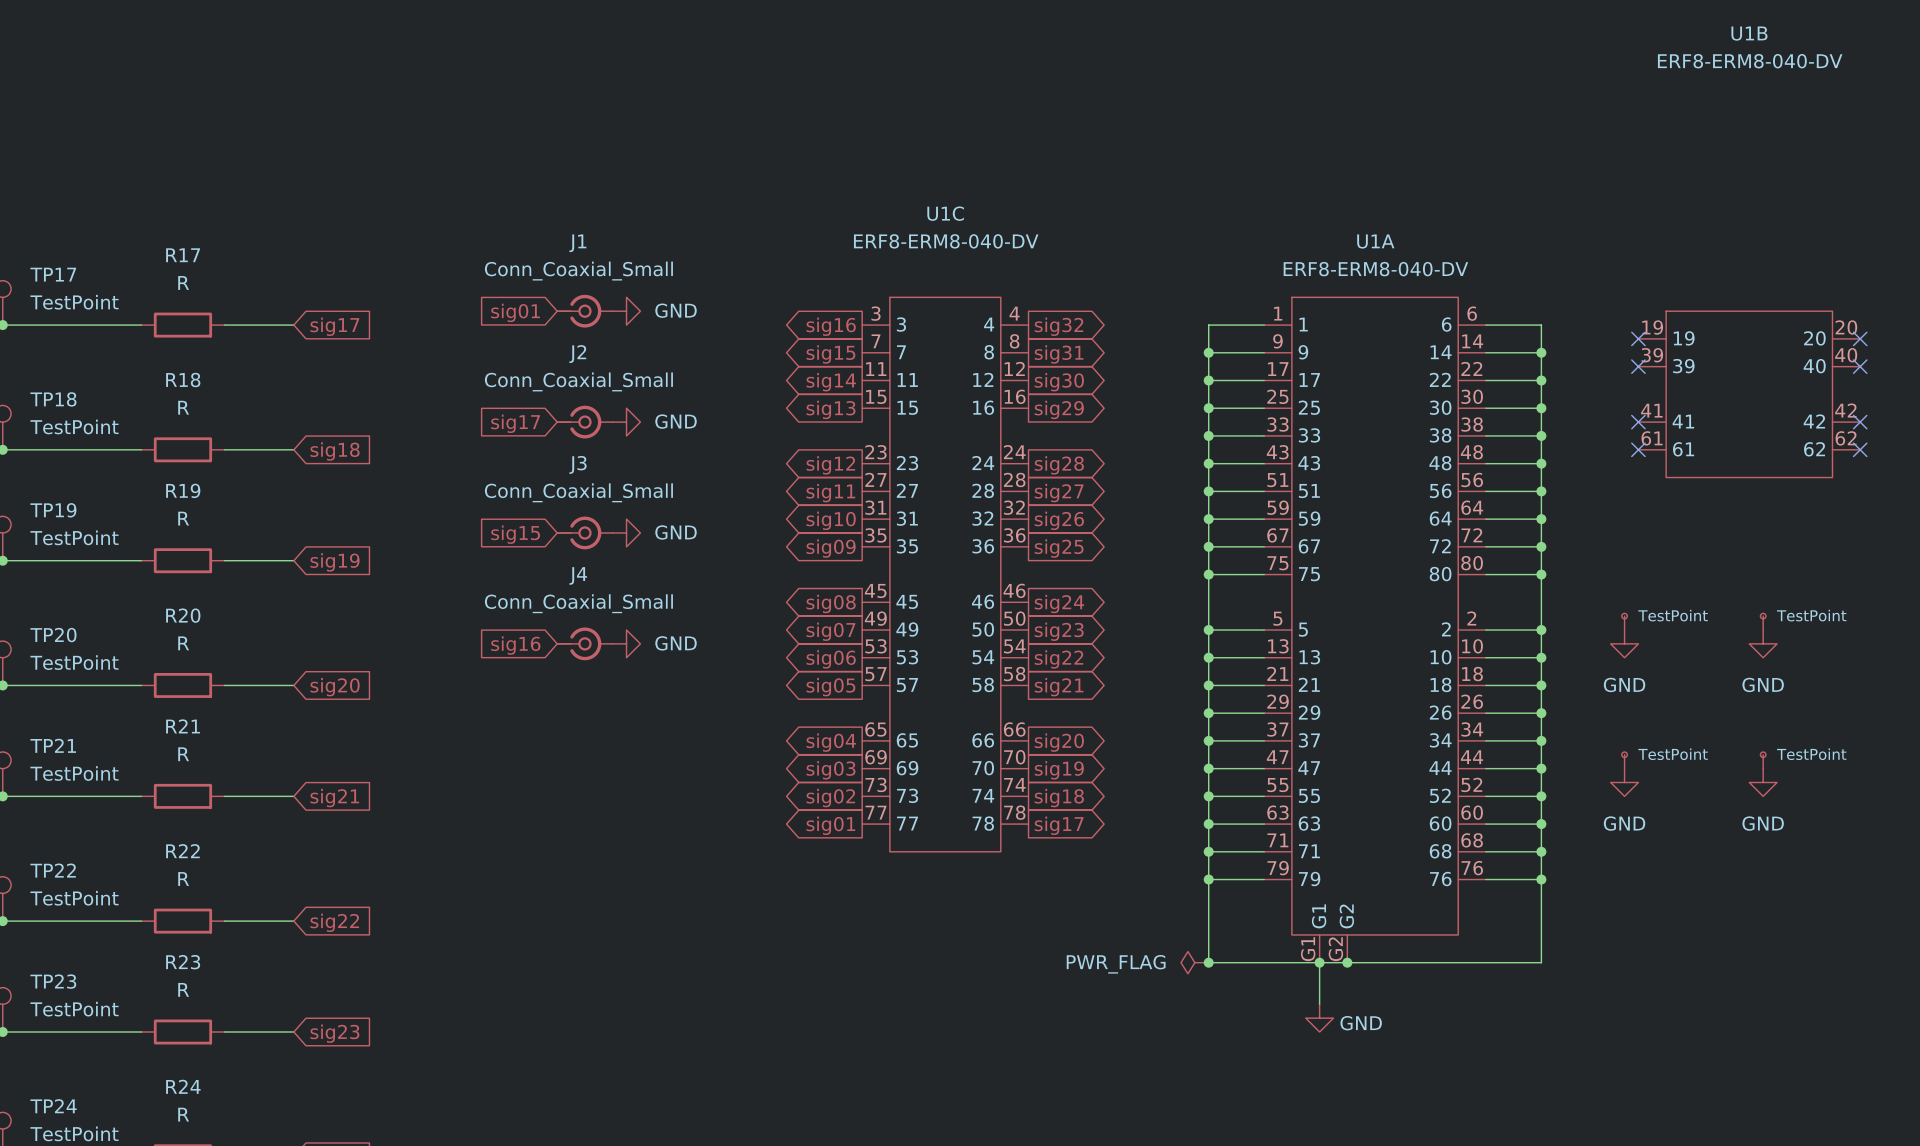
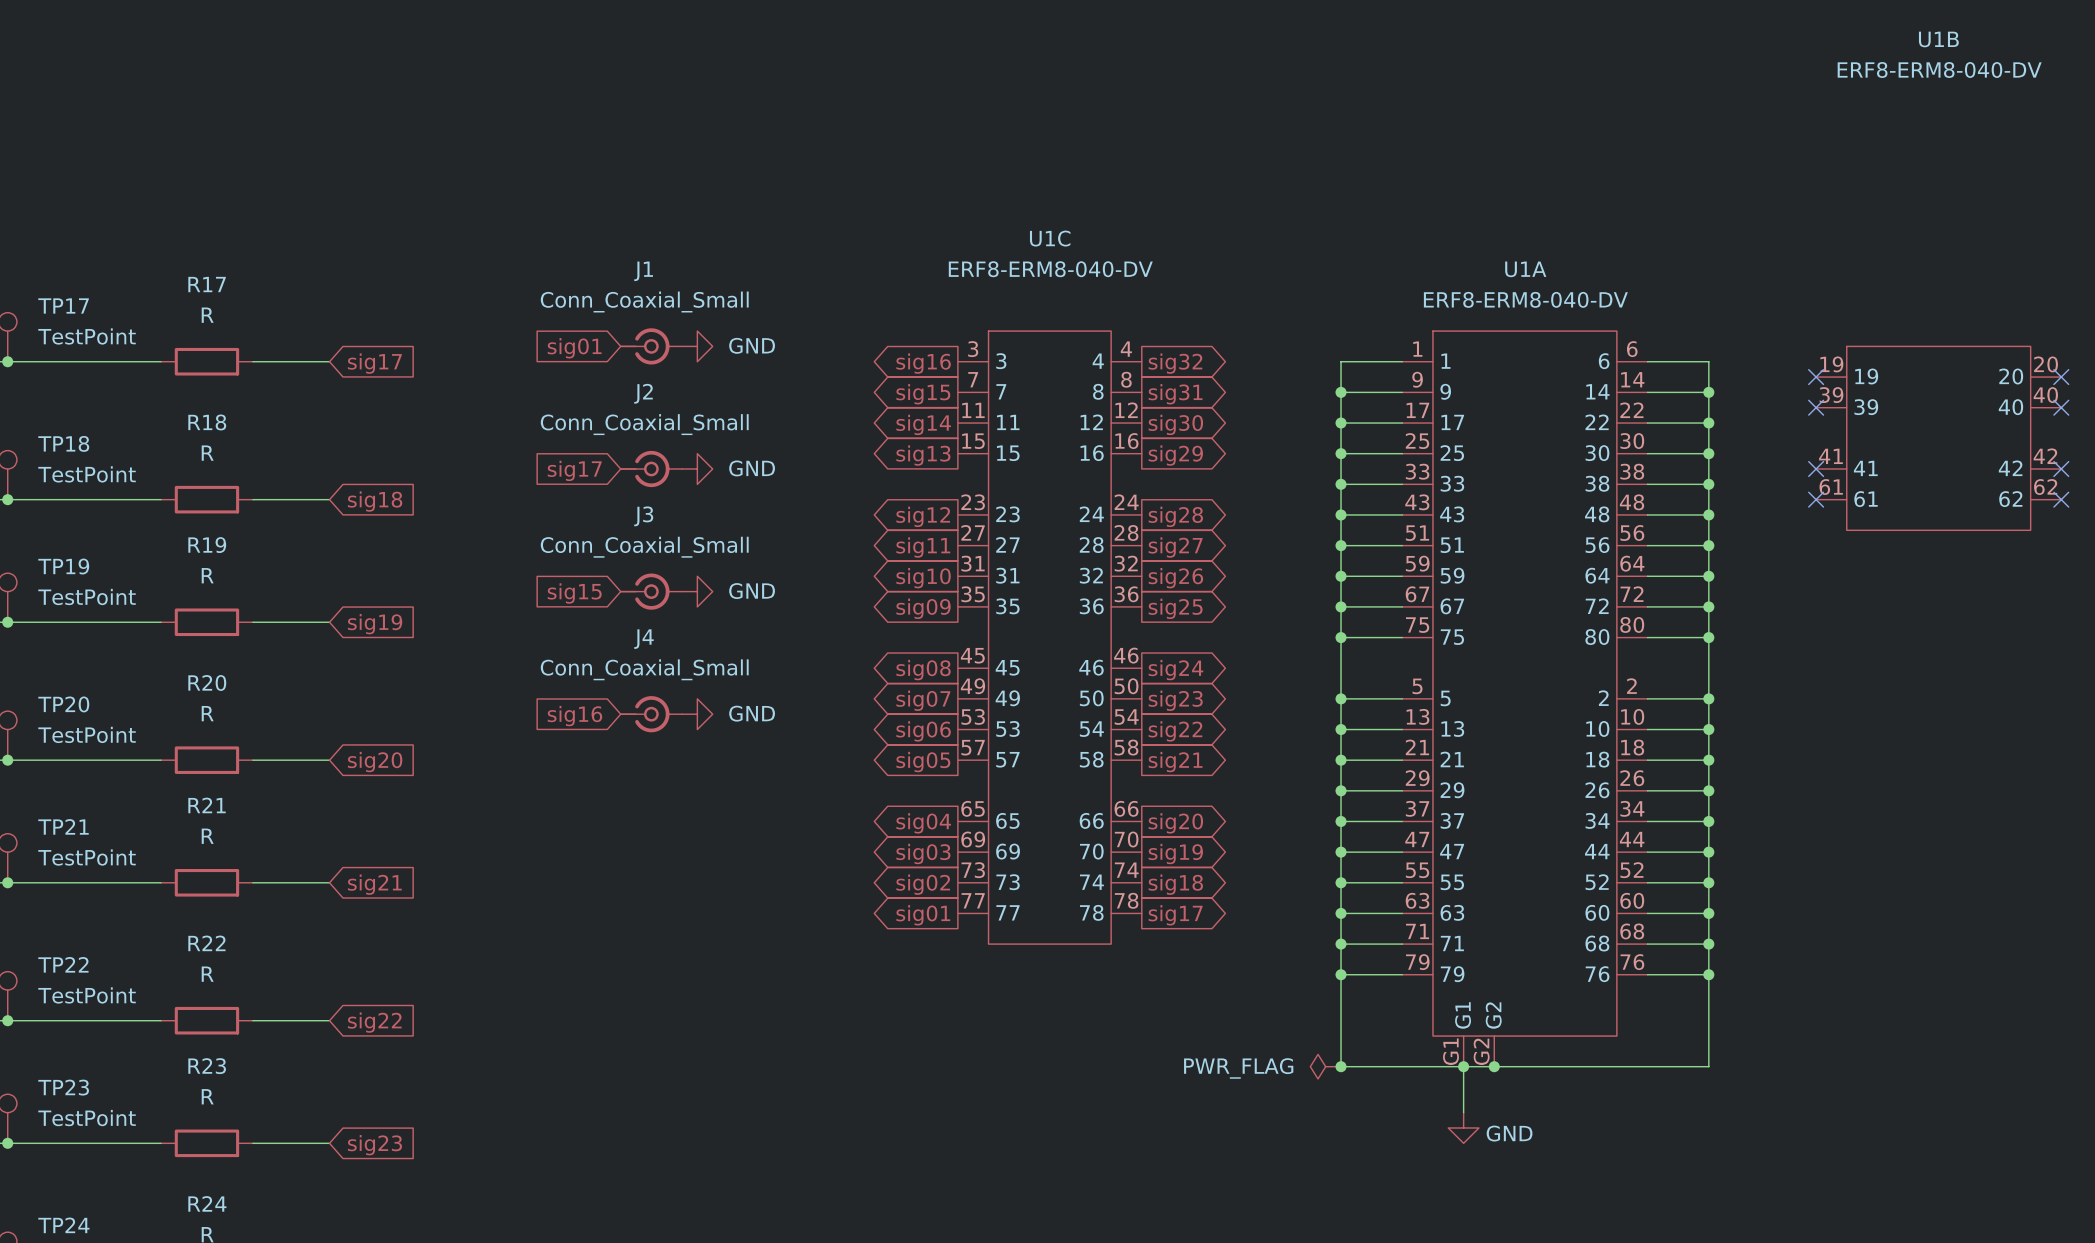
part: TestPoint (1624, 621) -> none
part: TestPoint (1763, 621) -> none
power symbol: GND (1624, 643) -> none
power symbol: GND (1763, 643) -> none
part: TestPoint (1624, 760) -> none
part: TestPoint (1763, 760) -> none
power symbol: GND (1624, 782) -> none
power symbol: GND (1763, 782) -> none

